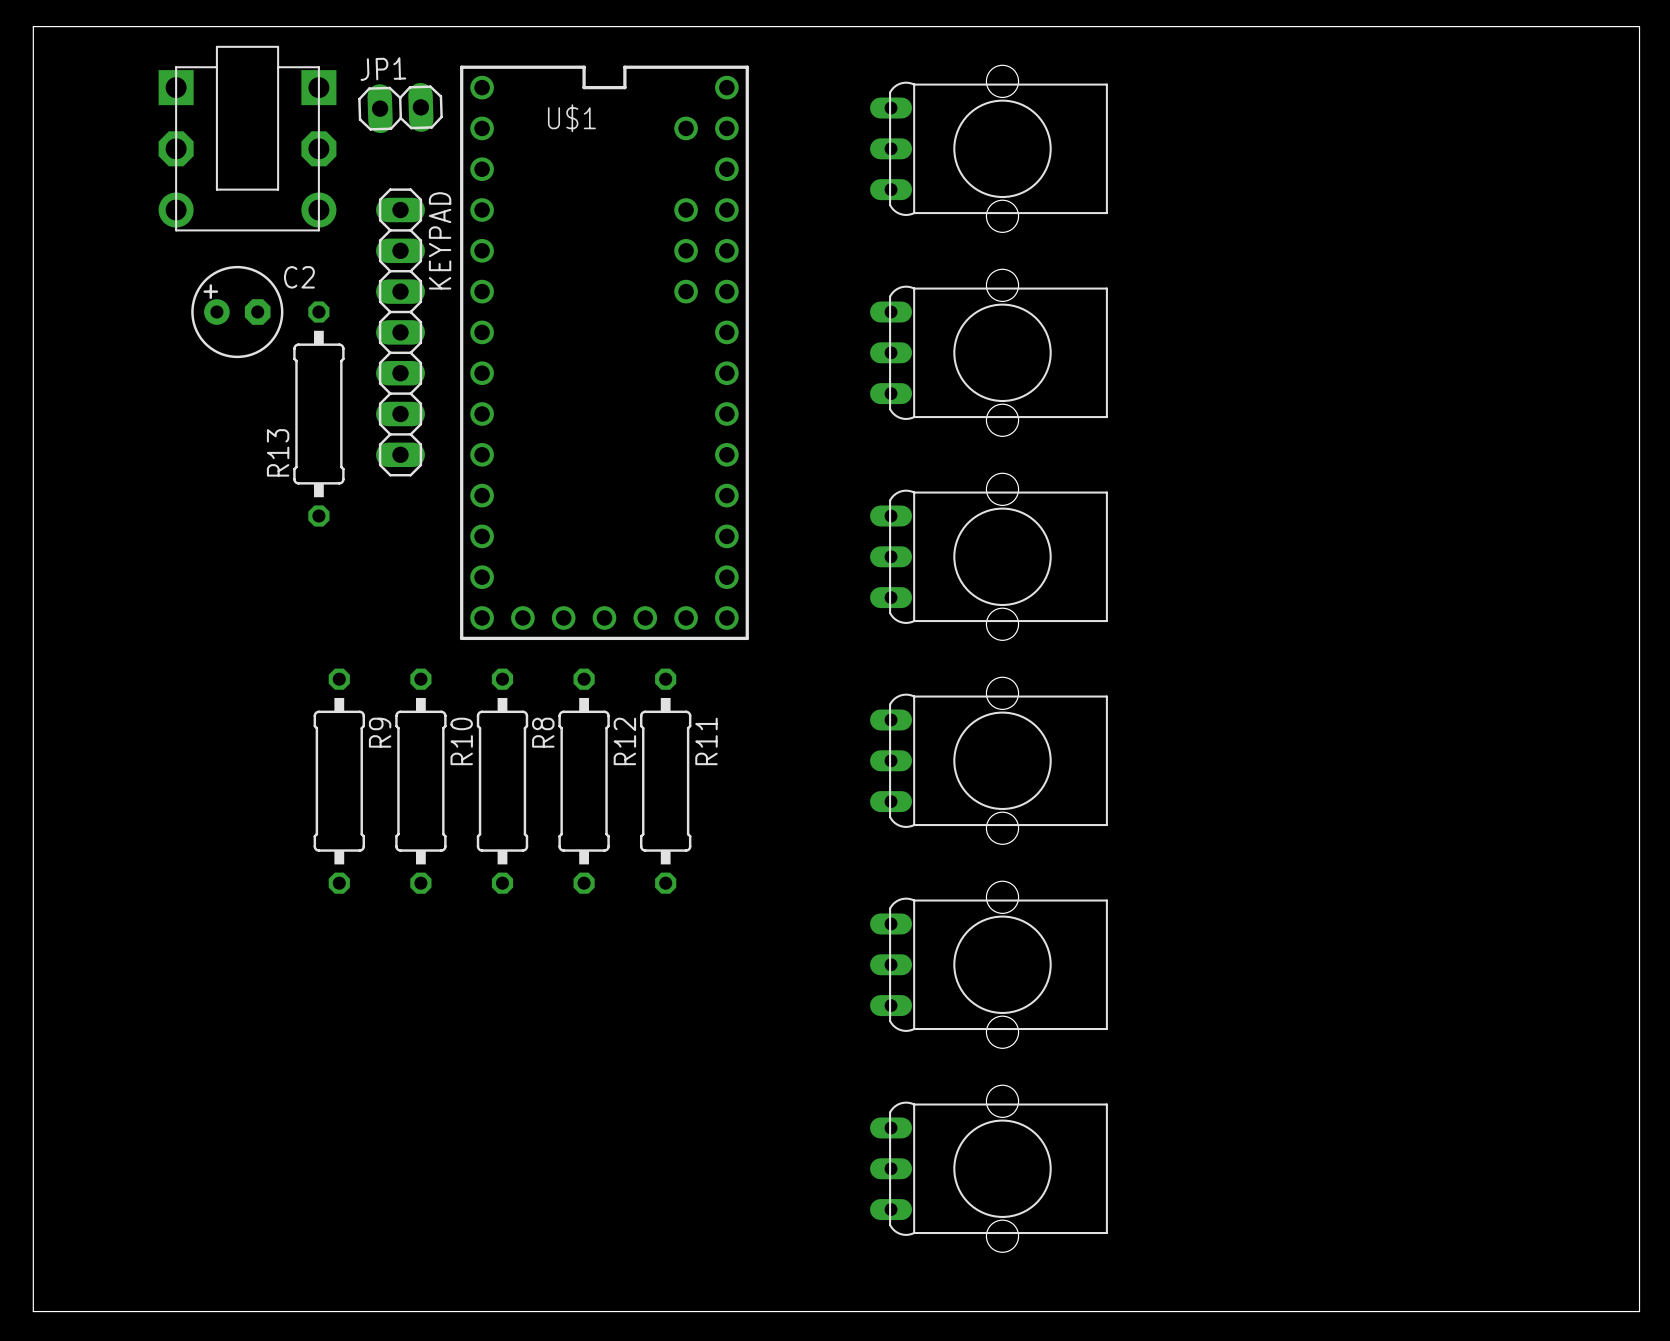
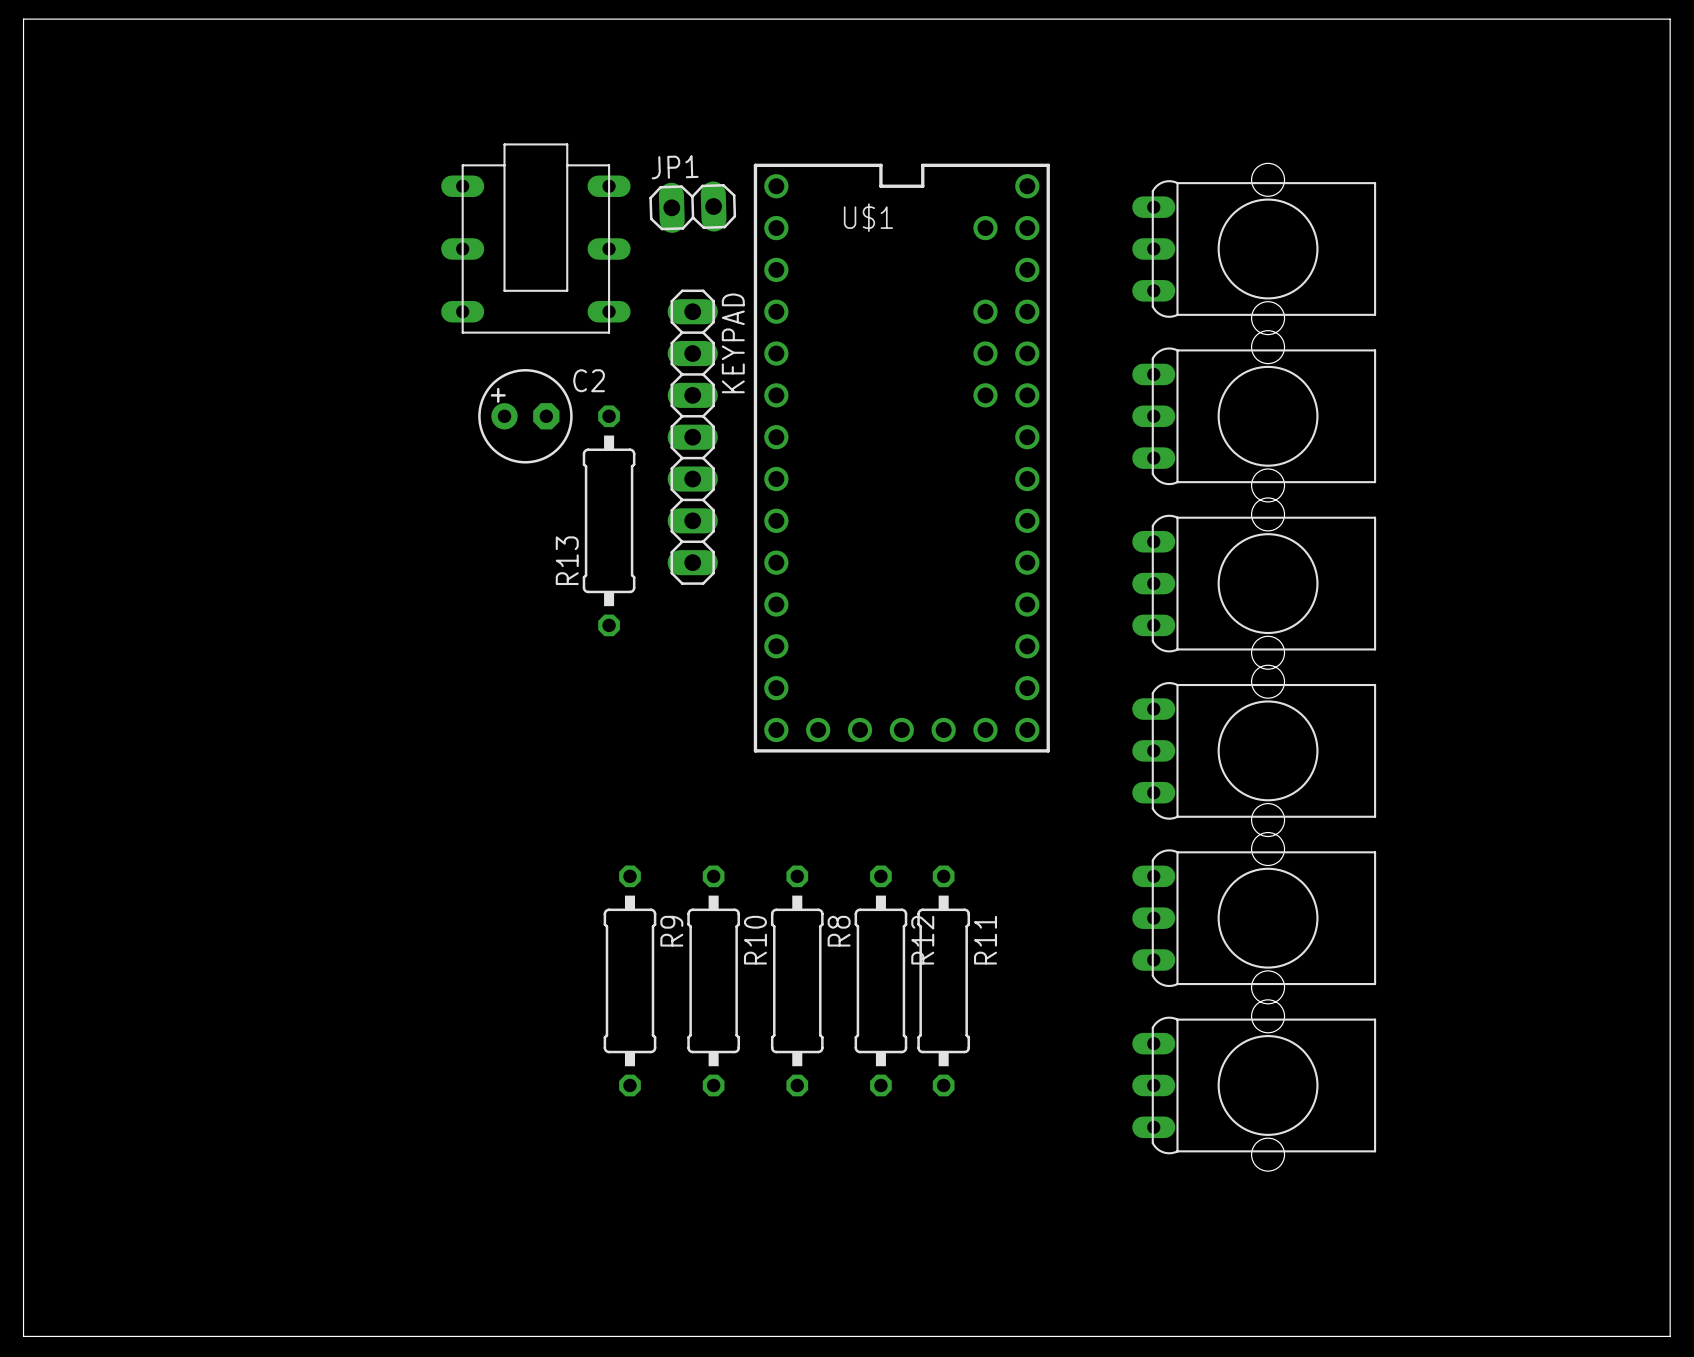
JP1 position: (400, 108) -> (692, 207)
part: (247, 138) -> none
part: (988, 148) -> none
part: none -> (535, 238)
part: none -> (1254, 248)
C2 position: (237, 312) -> (525, 416)
KEYPAD position: (400, 332) -> (692, 437)
U$1 position: (604, 352) -> (901, 458)
part: (988, 352) -> none
R13 position: (318, 414) -> (609, 520)
part: none -> (1254, 416)
part: (988, 556) -> none
part: none -> (1254, 583)
part: none -> (1254, 750)
part: (988, 760) -> none
R9 position: (339, 781) -> (629, 980)
R10 position: (420, 781) -> (713, 980)
R8 position: (502, 781) -> (797, 980)
R12 position: (584, 781) -> (880, 980)
R11 position: (665, 781) -> (943, 980)
part: none -> (1254, 918)
part: (988, 964) -> none
part: none -> (1254, 1085)
part: (988, 1168) -> none

